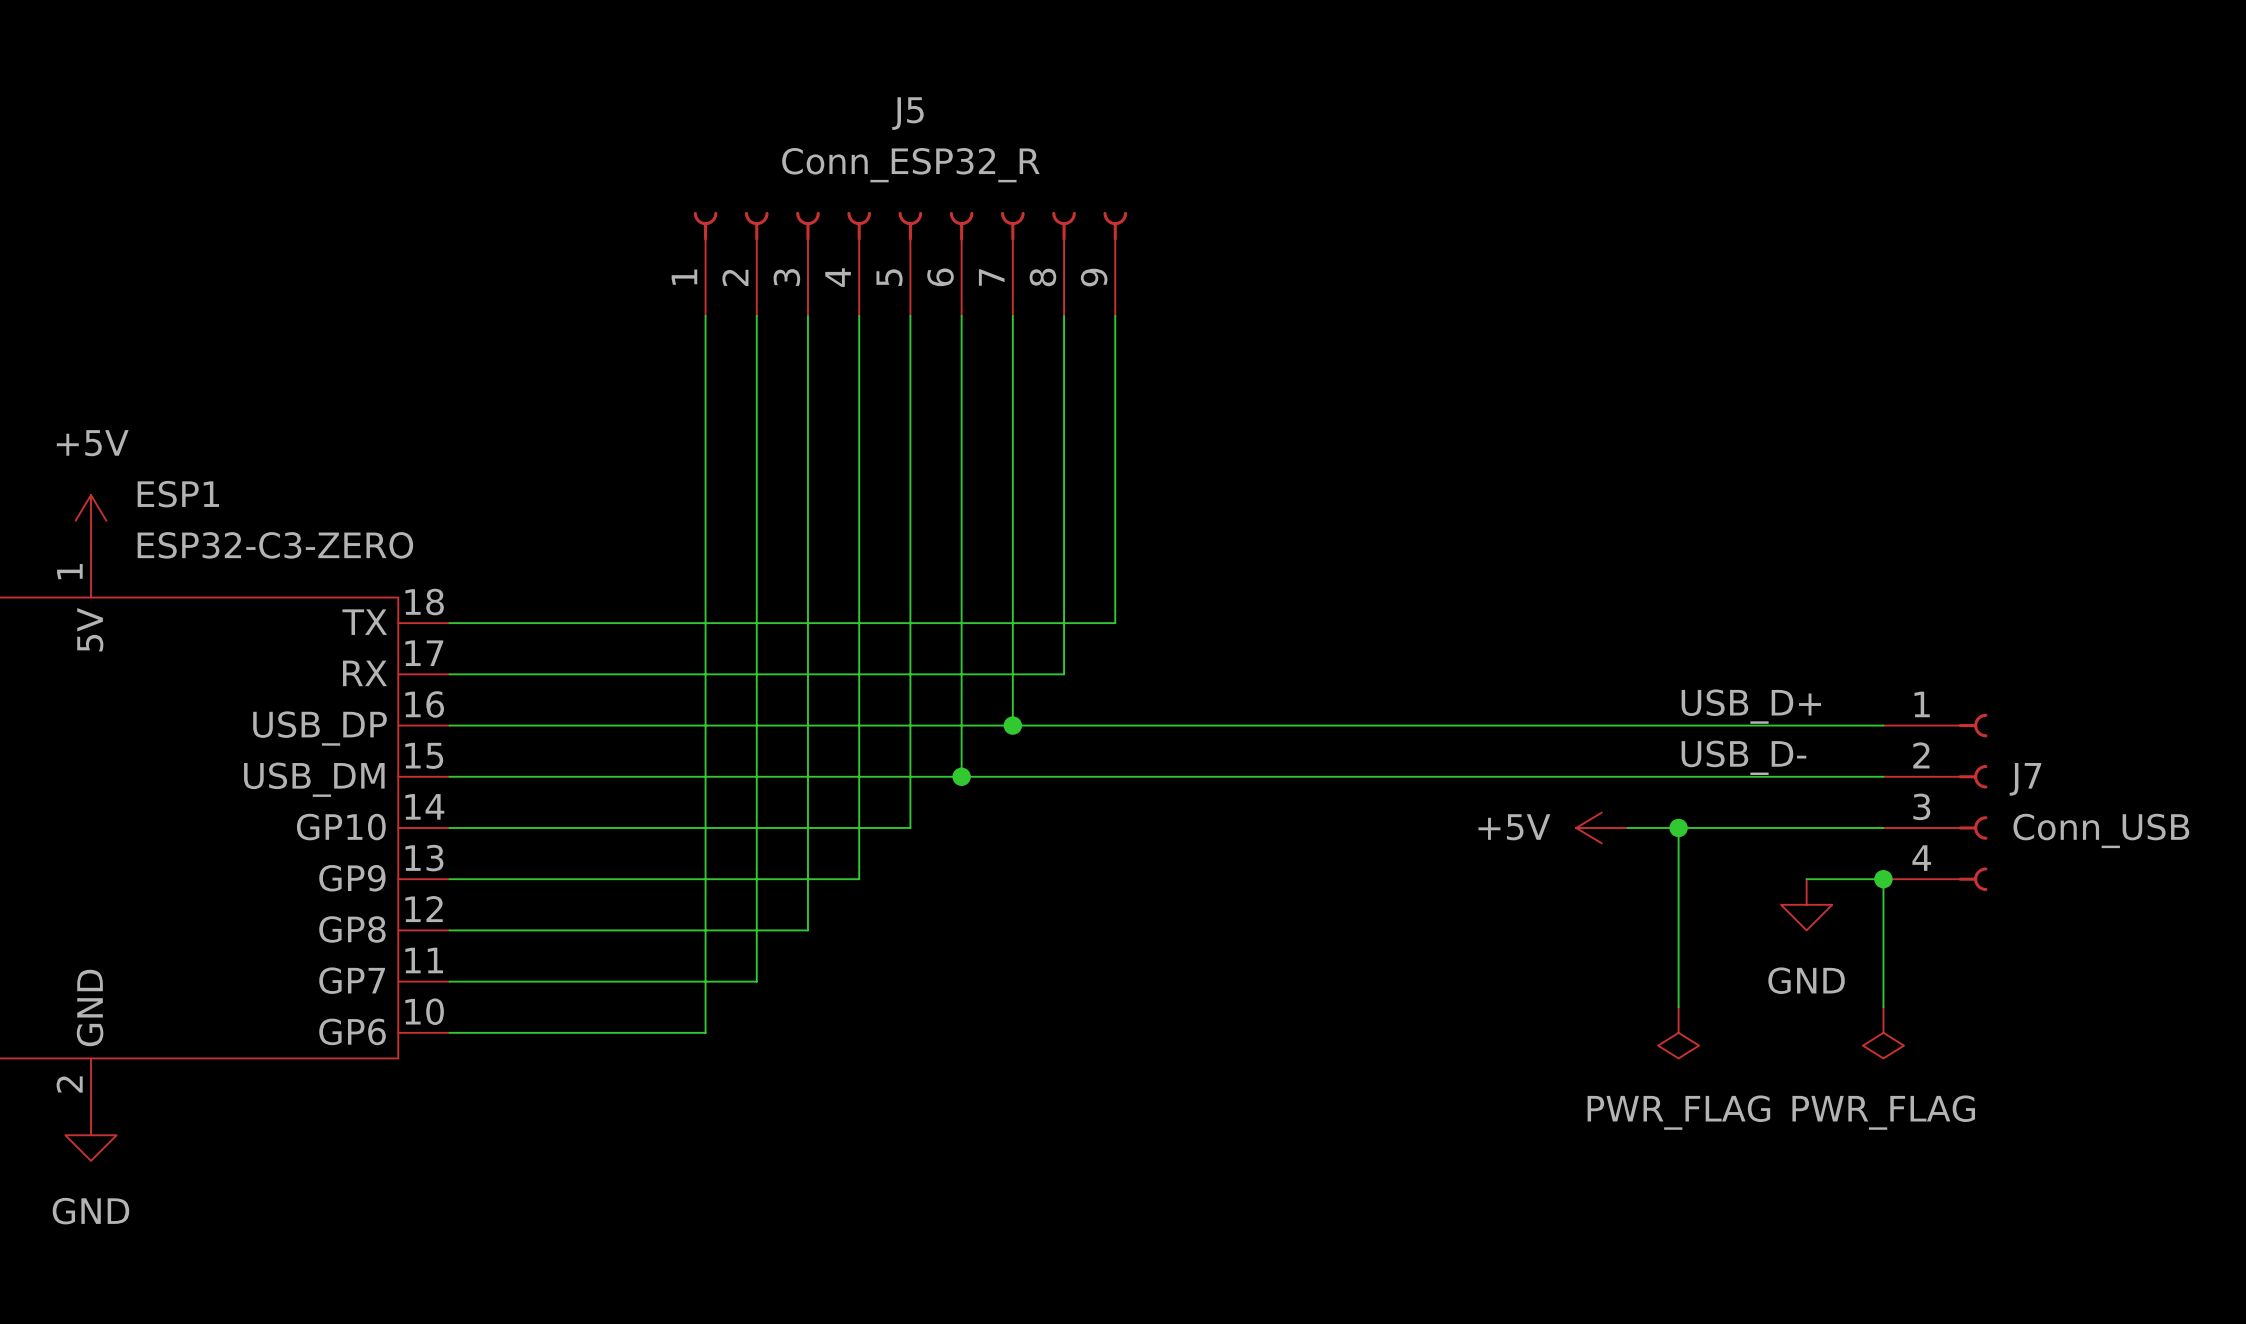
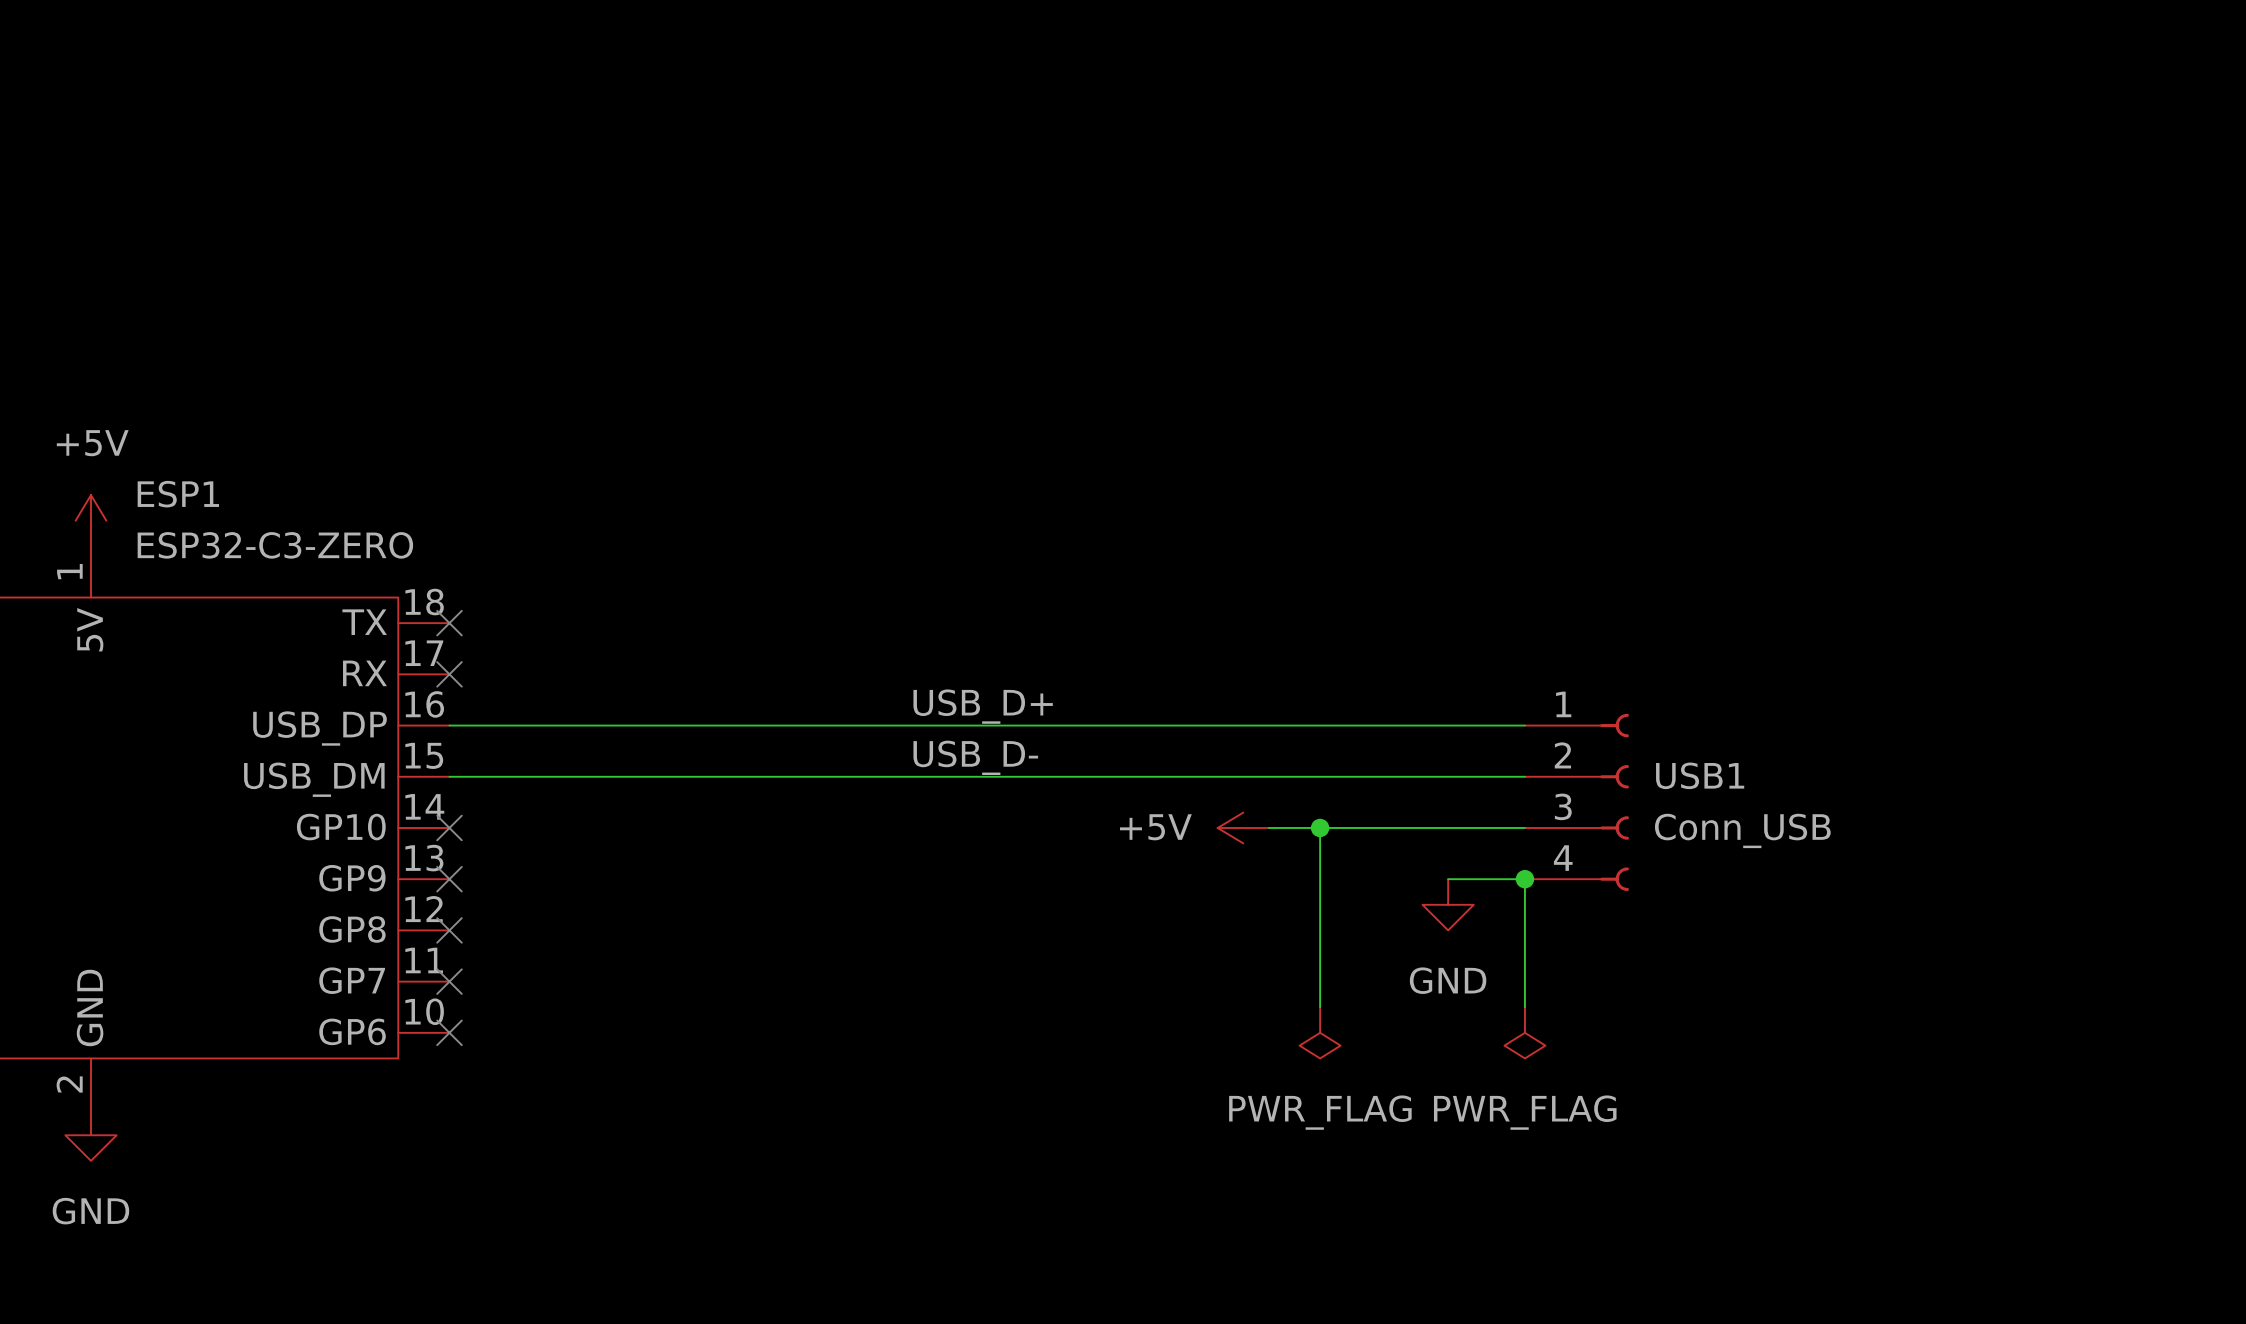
J5: Conn_ESP32_R (910, 263) -> none
wire: (705, 315) (705, 1032) (449, 1032) -> none
wire: (756, 315) (756, 981) (449, 981) -> none
wire: (807, 315) (807, 930) (449, 930) -> none
wire: (859, 315) (859, 879) (449, 879) -> none
wire: (910, 315) (910, 827) (449, 827) -> none
wire: (961, 315) (961, 776) -> none
wire: (1012, 315) (1012, 725) -> none
wire: (1064, 315) (1064, 674) (449, 674) -> none
wire: (1115, 315) (1115, 623) (449, 623) -> none
no-connect mark: none -> (449, 623)
no-connect mark: none -> (449, 674)
label: none -> USB_D+ (983, 706)
label: USB_D+ (1751, 706) -> none
junction: (1012, 725) -> none
wire: (1524, 725) (1883, 725) -> none
label: none -> USB_D- (975, 757)
label: USB_D- (1743, 757) -> none
junction: (961, 776) -> none
wire: (1524, 776) (1883, 776) -> none
USB1: none -> Conn_USB (1576, 802)
J7: Conn_USB (1935, 802) -> none
no-connect mark: none -> (449, 827)
junction: none -> (1320, 827)
power symbol position: +5V (1601, 827) -> +5V (1243, 827)
wire: (1627, 827) (1883, 827) -> (1268, 827) (1524, 827)
wire: (1678, 827) (1678, 1007) -> (1320, 827) (1320, 1007)
junction: (1678, 827) -> none
no-connect mark: none -> (449, 879)
junction: none -> (1524, 879)
wire: (1806, 879) (1883, 879) (1883, 1007) -> (1448, 879) (1524, 879) (1524, 1007)
junction: (1883, 879) -> none
power symbol position: GND (1806, 904) -> GND (1448, 904)
no-connect mark: none -> (449, 930)
no-connect mark: none -> (449, 981)
no-connect mark: none -> (449, 1032)
power symbol: none -> PWR_FLAG (1320, 1032)
power symbol position: PWR_FLAG (1678, 1032) -> PWR_FLAG (1524, 1032)
power symbol: PWR_FLAG (1883, 1032) -> none

